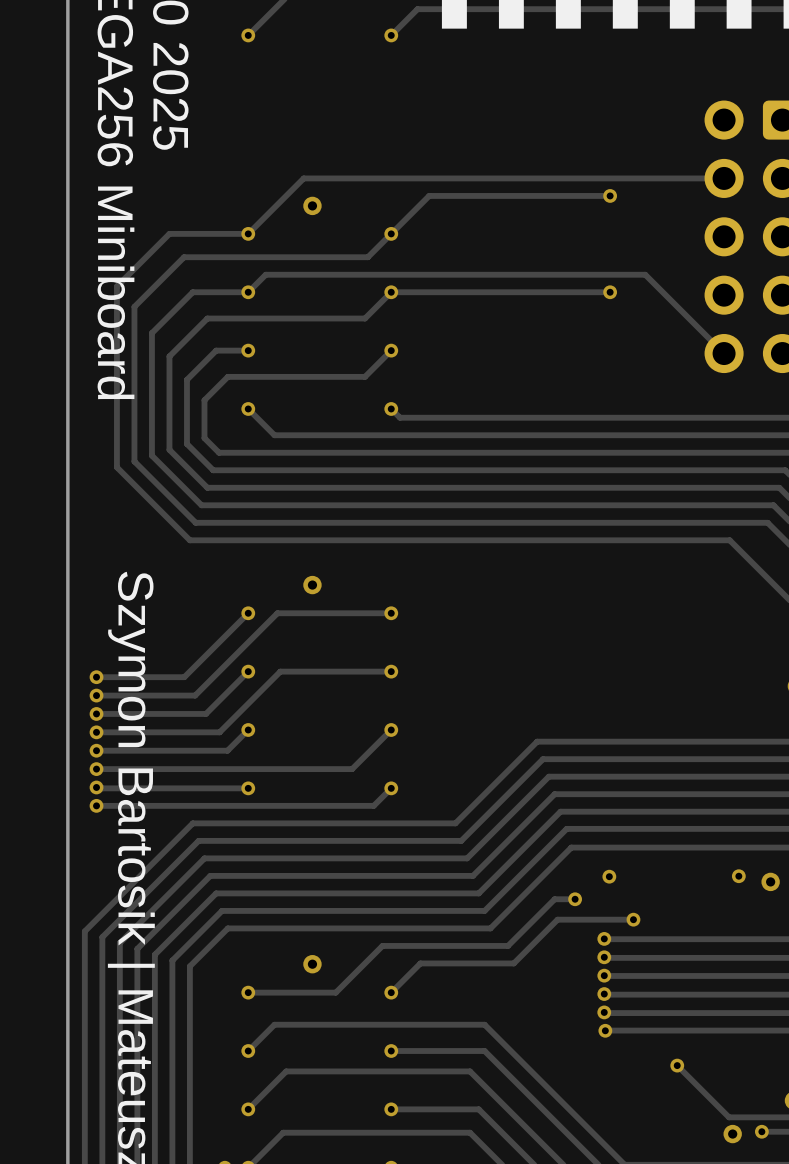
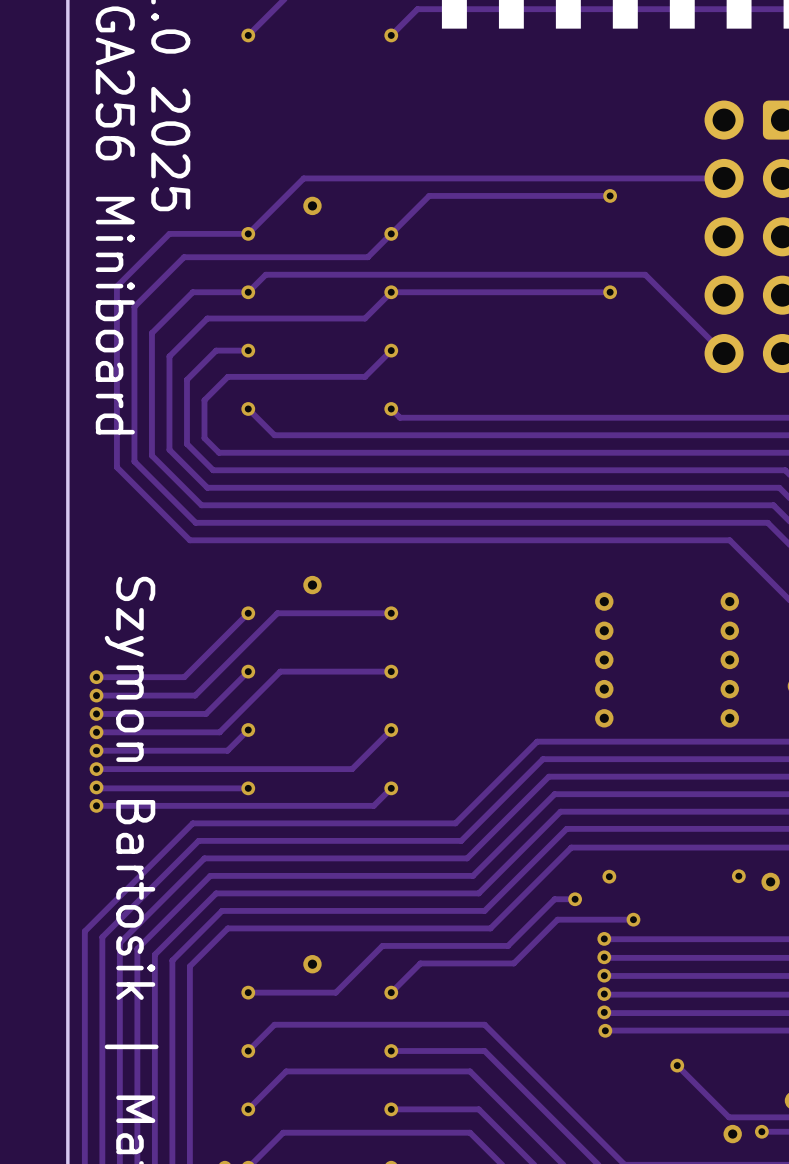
via: none -> (604, 601)
via: none -> (729, 601)
via: none -> (604, 630)
via: none -> (729, 630)
via: none -> (604, 659)
via: none -> (729, 659)
via: none -> (604, 689)
via: none -> (729, 689)
via: none -> (604, 718)
via: none -> (729, 718)

